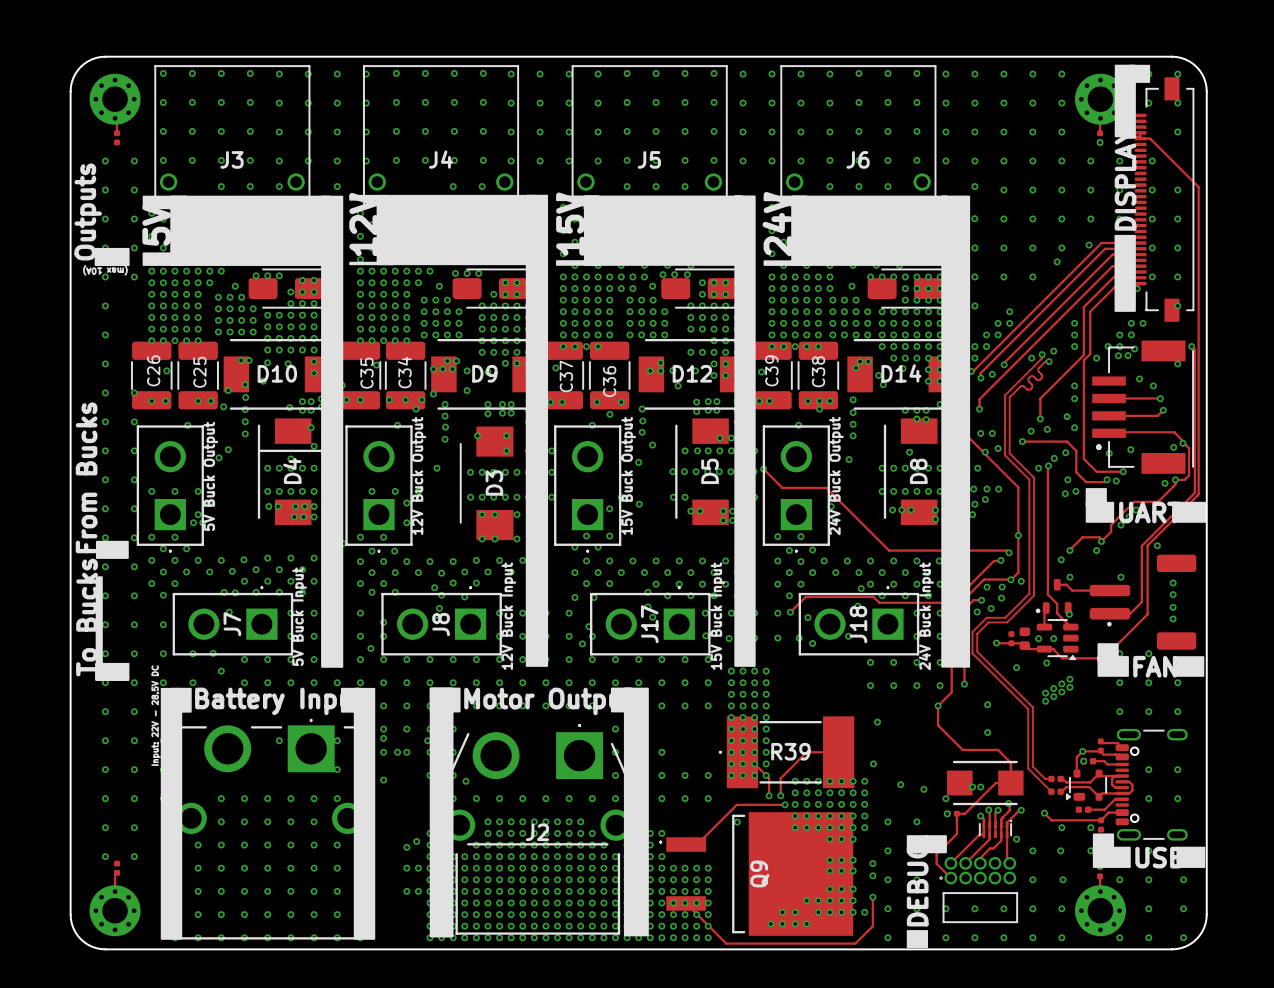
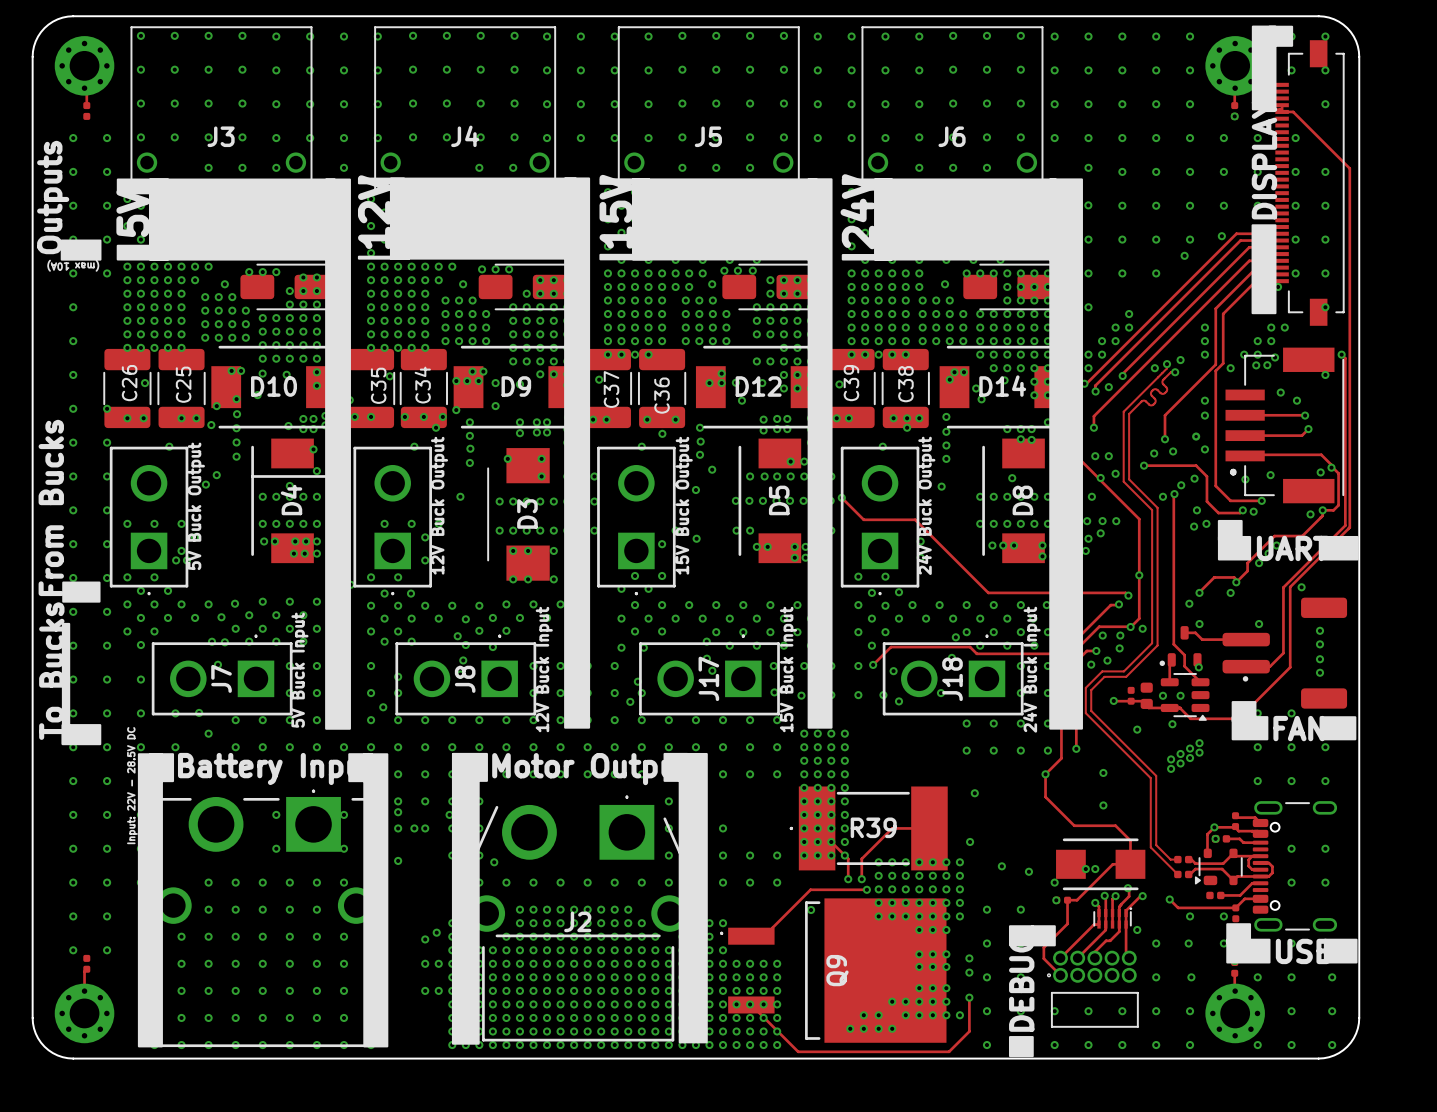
via: none -> (276, 848)

